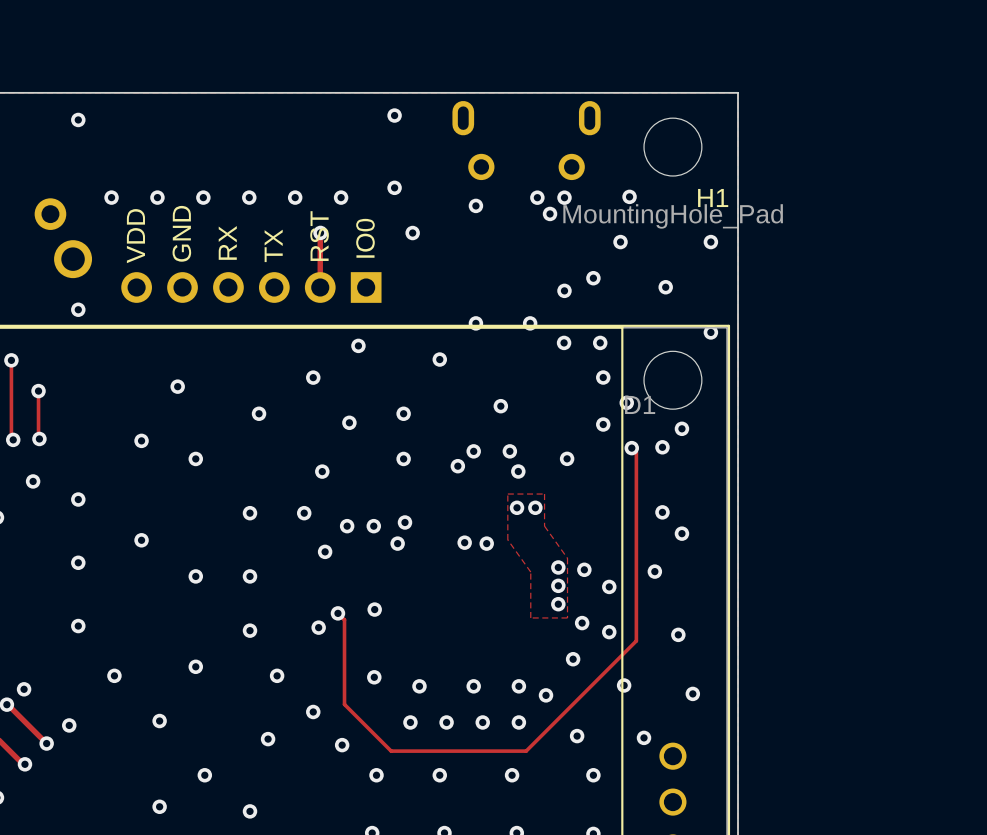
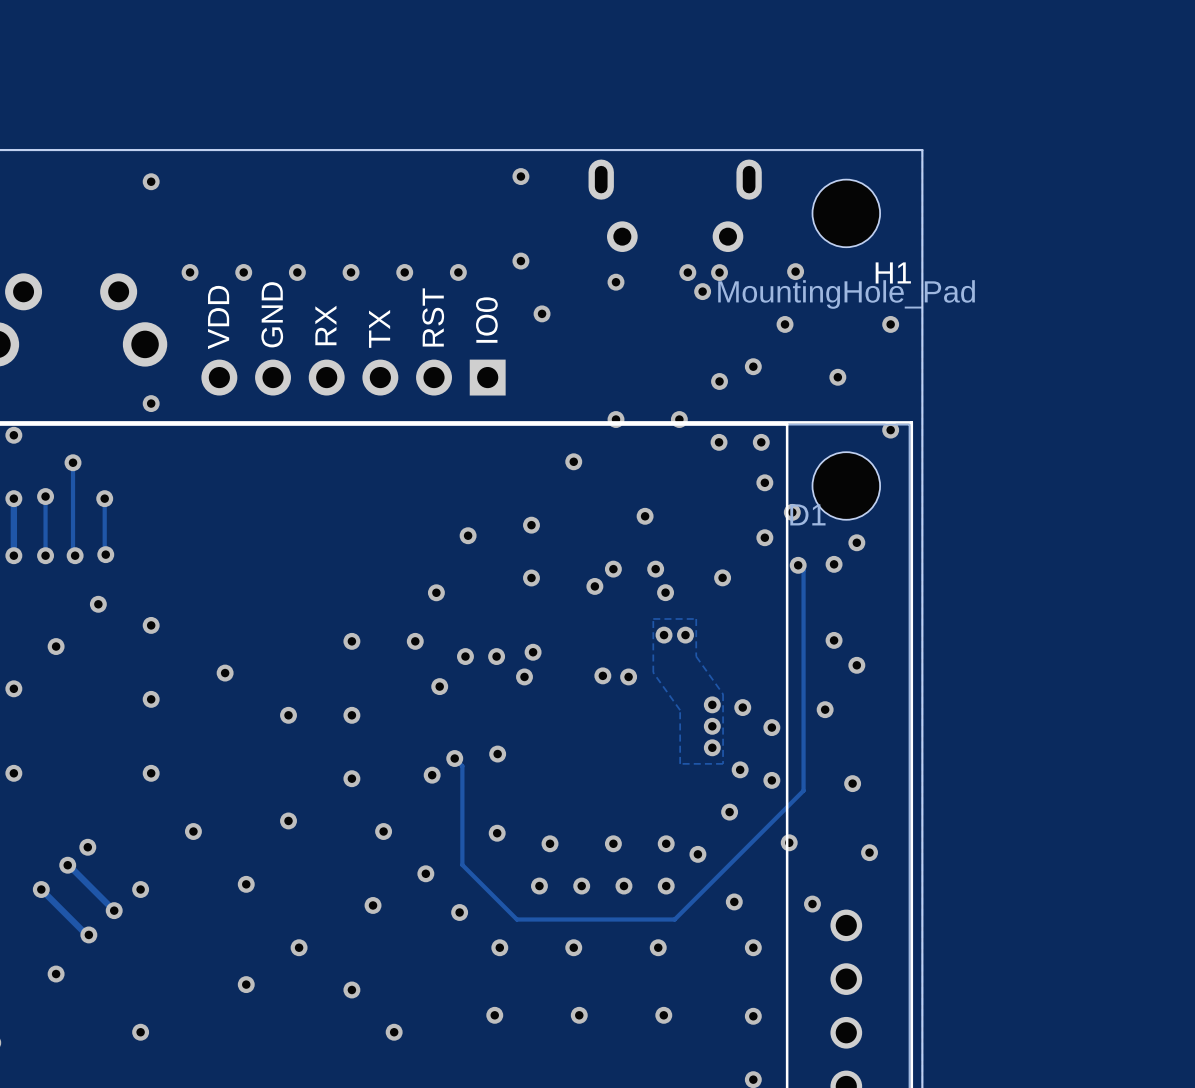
via: (320, 232) -> none
track: (320, 233) (320, 287) -> none
via: (358, 345) -> none
via: (313, 377) -> none
via: (177, 386) -> none
via: (259, 413) -> none
via: (141, 440) -> none
via: (195, 458) -> none

